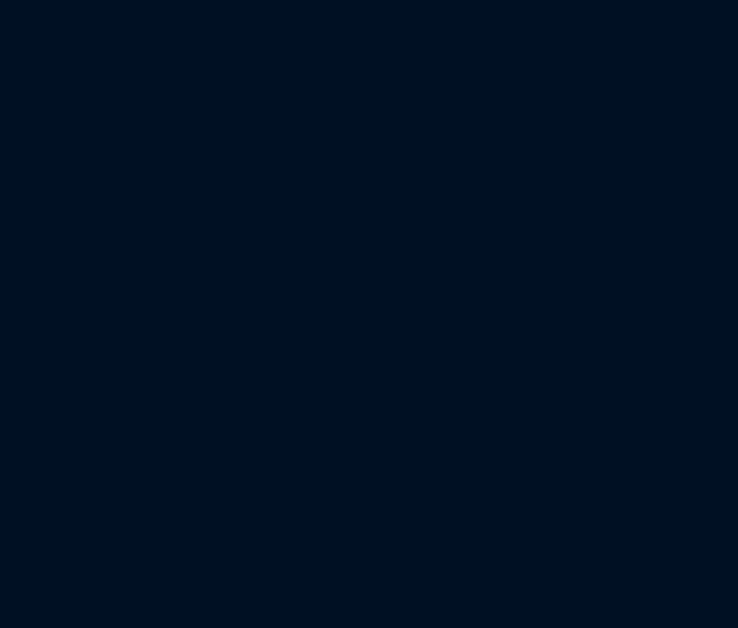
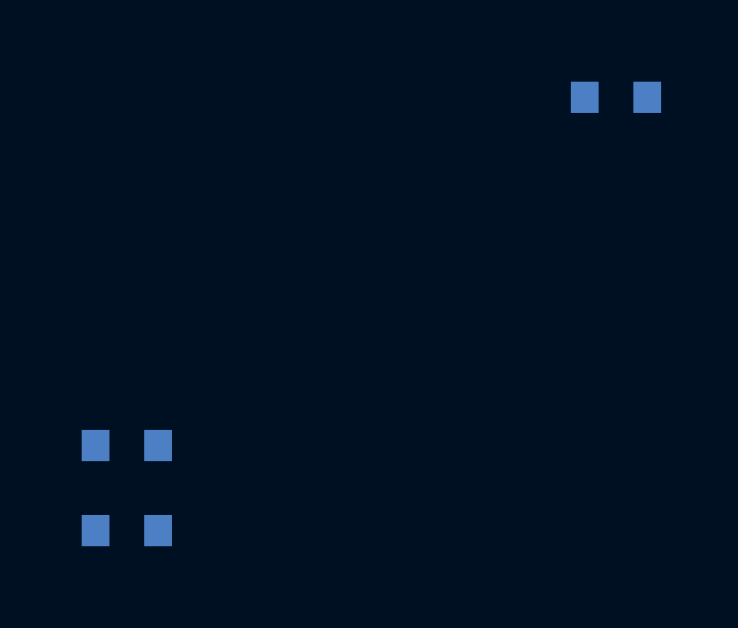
part: none -> (615, 97)
part: none -> (126, 445)
part: none -> (126, 530)

